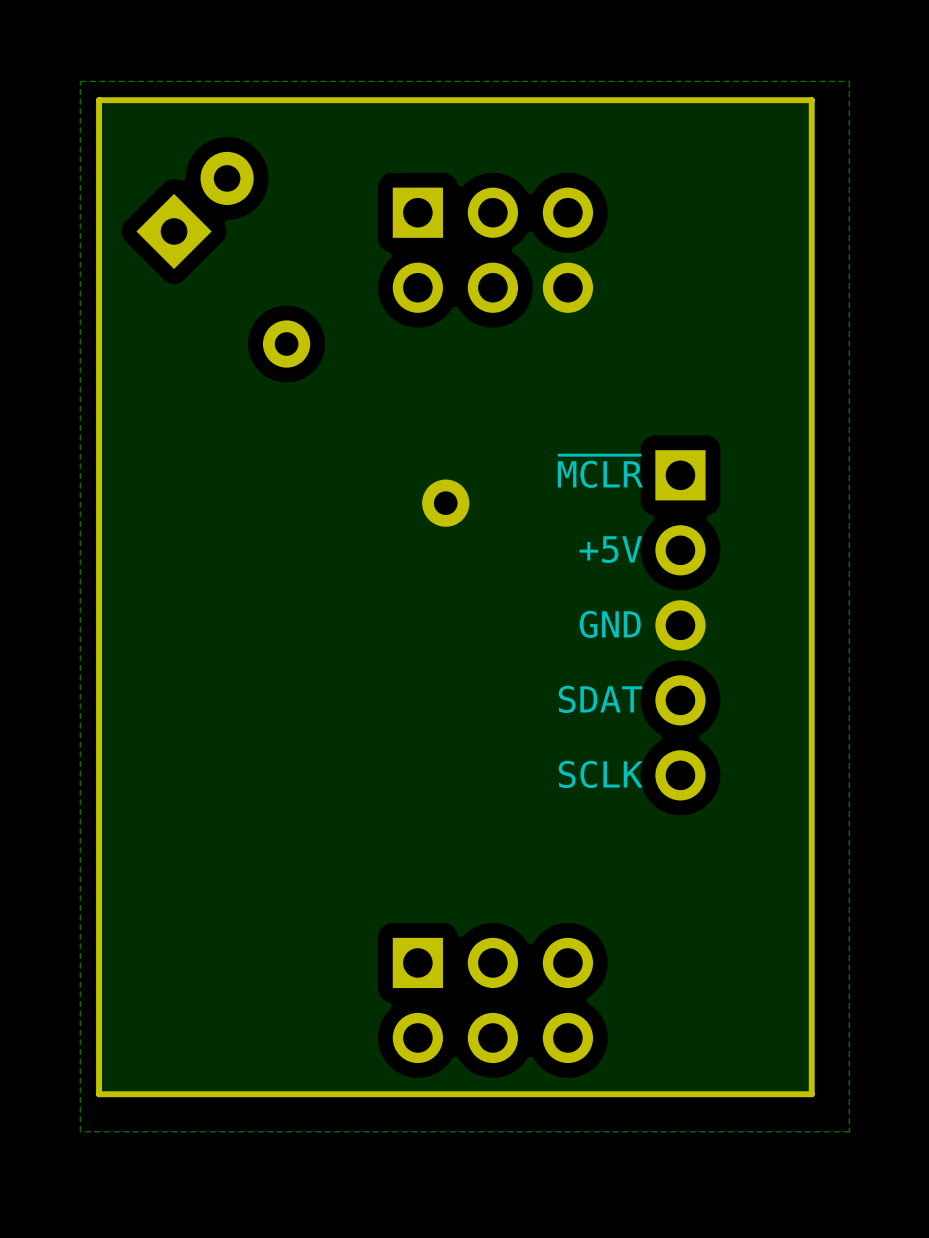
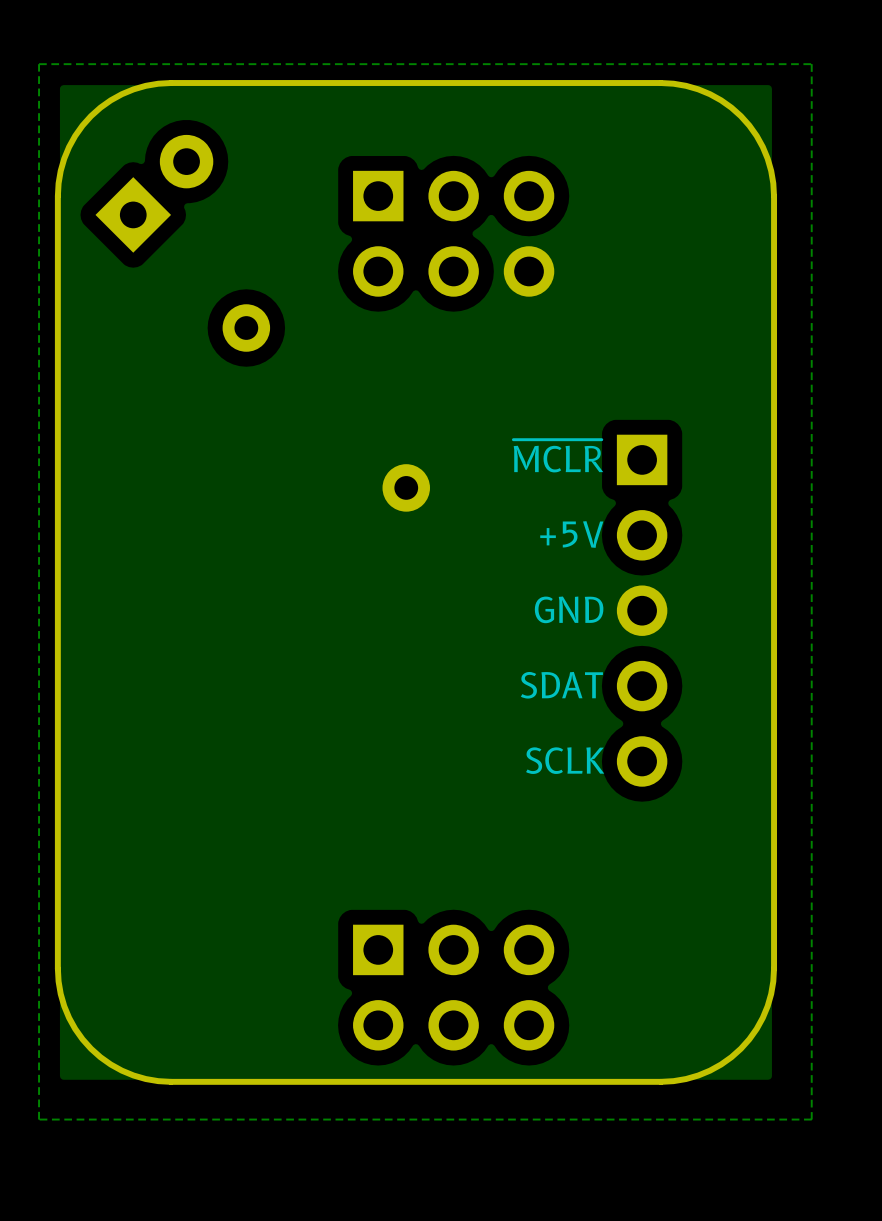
board edge: (211, 100) (99, 100) (99, 212) -> (170, 83) (133, 89) (110, 100) (90, 116) (69, 147) (60, 170) (57, 196)
board edge: (699, 100) (811, 100) (811, 212) -> (660, 83) (698, 89) (721, 100) (740, 116) (756, 135) (767, 158) (774, 196)
board edge: (99, 981) (99, 1094) (211, 1094) -> (57, 968) (60, 993) (69, 1017) (90, 1048) (110, 1064) (133, 1075) (170, 1081)
board edge: (811, 981) (811, 1094) (699, 1094) -> (774, 968) (767, 1006) (756, 1028) (740, 1048) (721, 1064) (698, 1075) (660, 1081)

